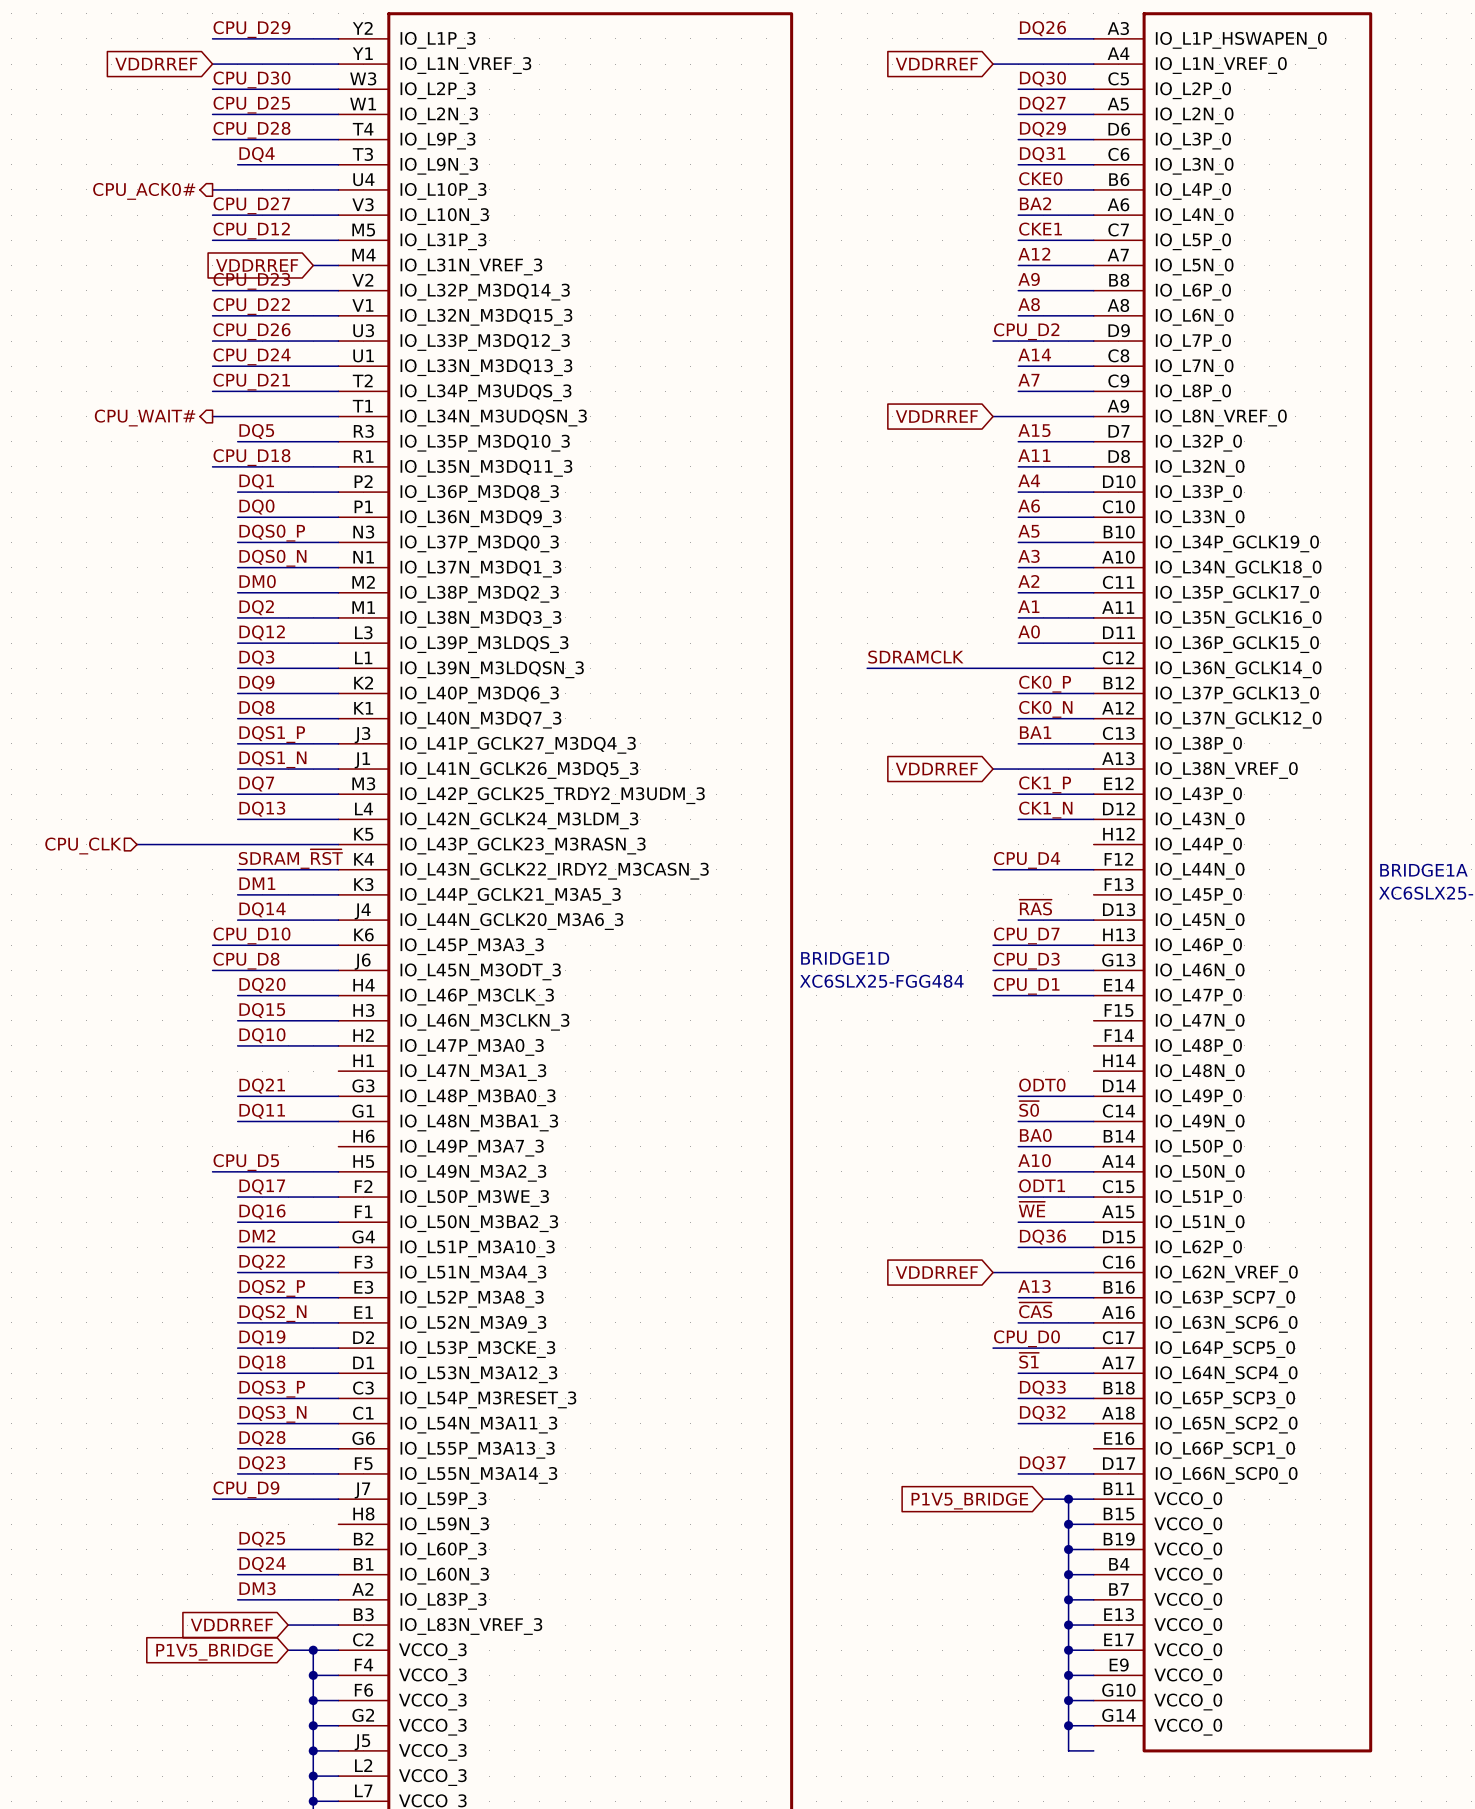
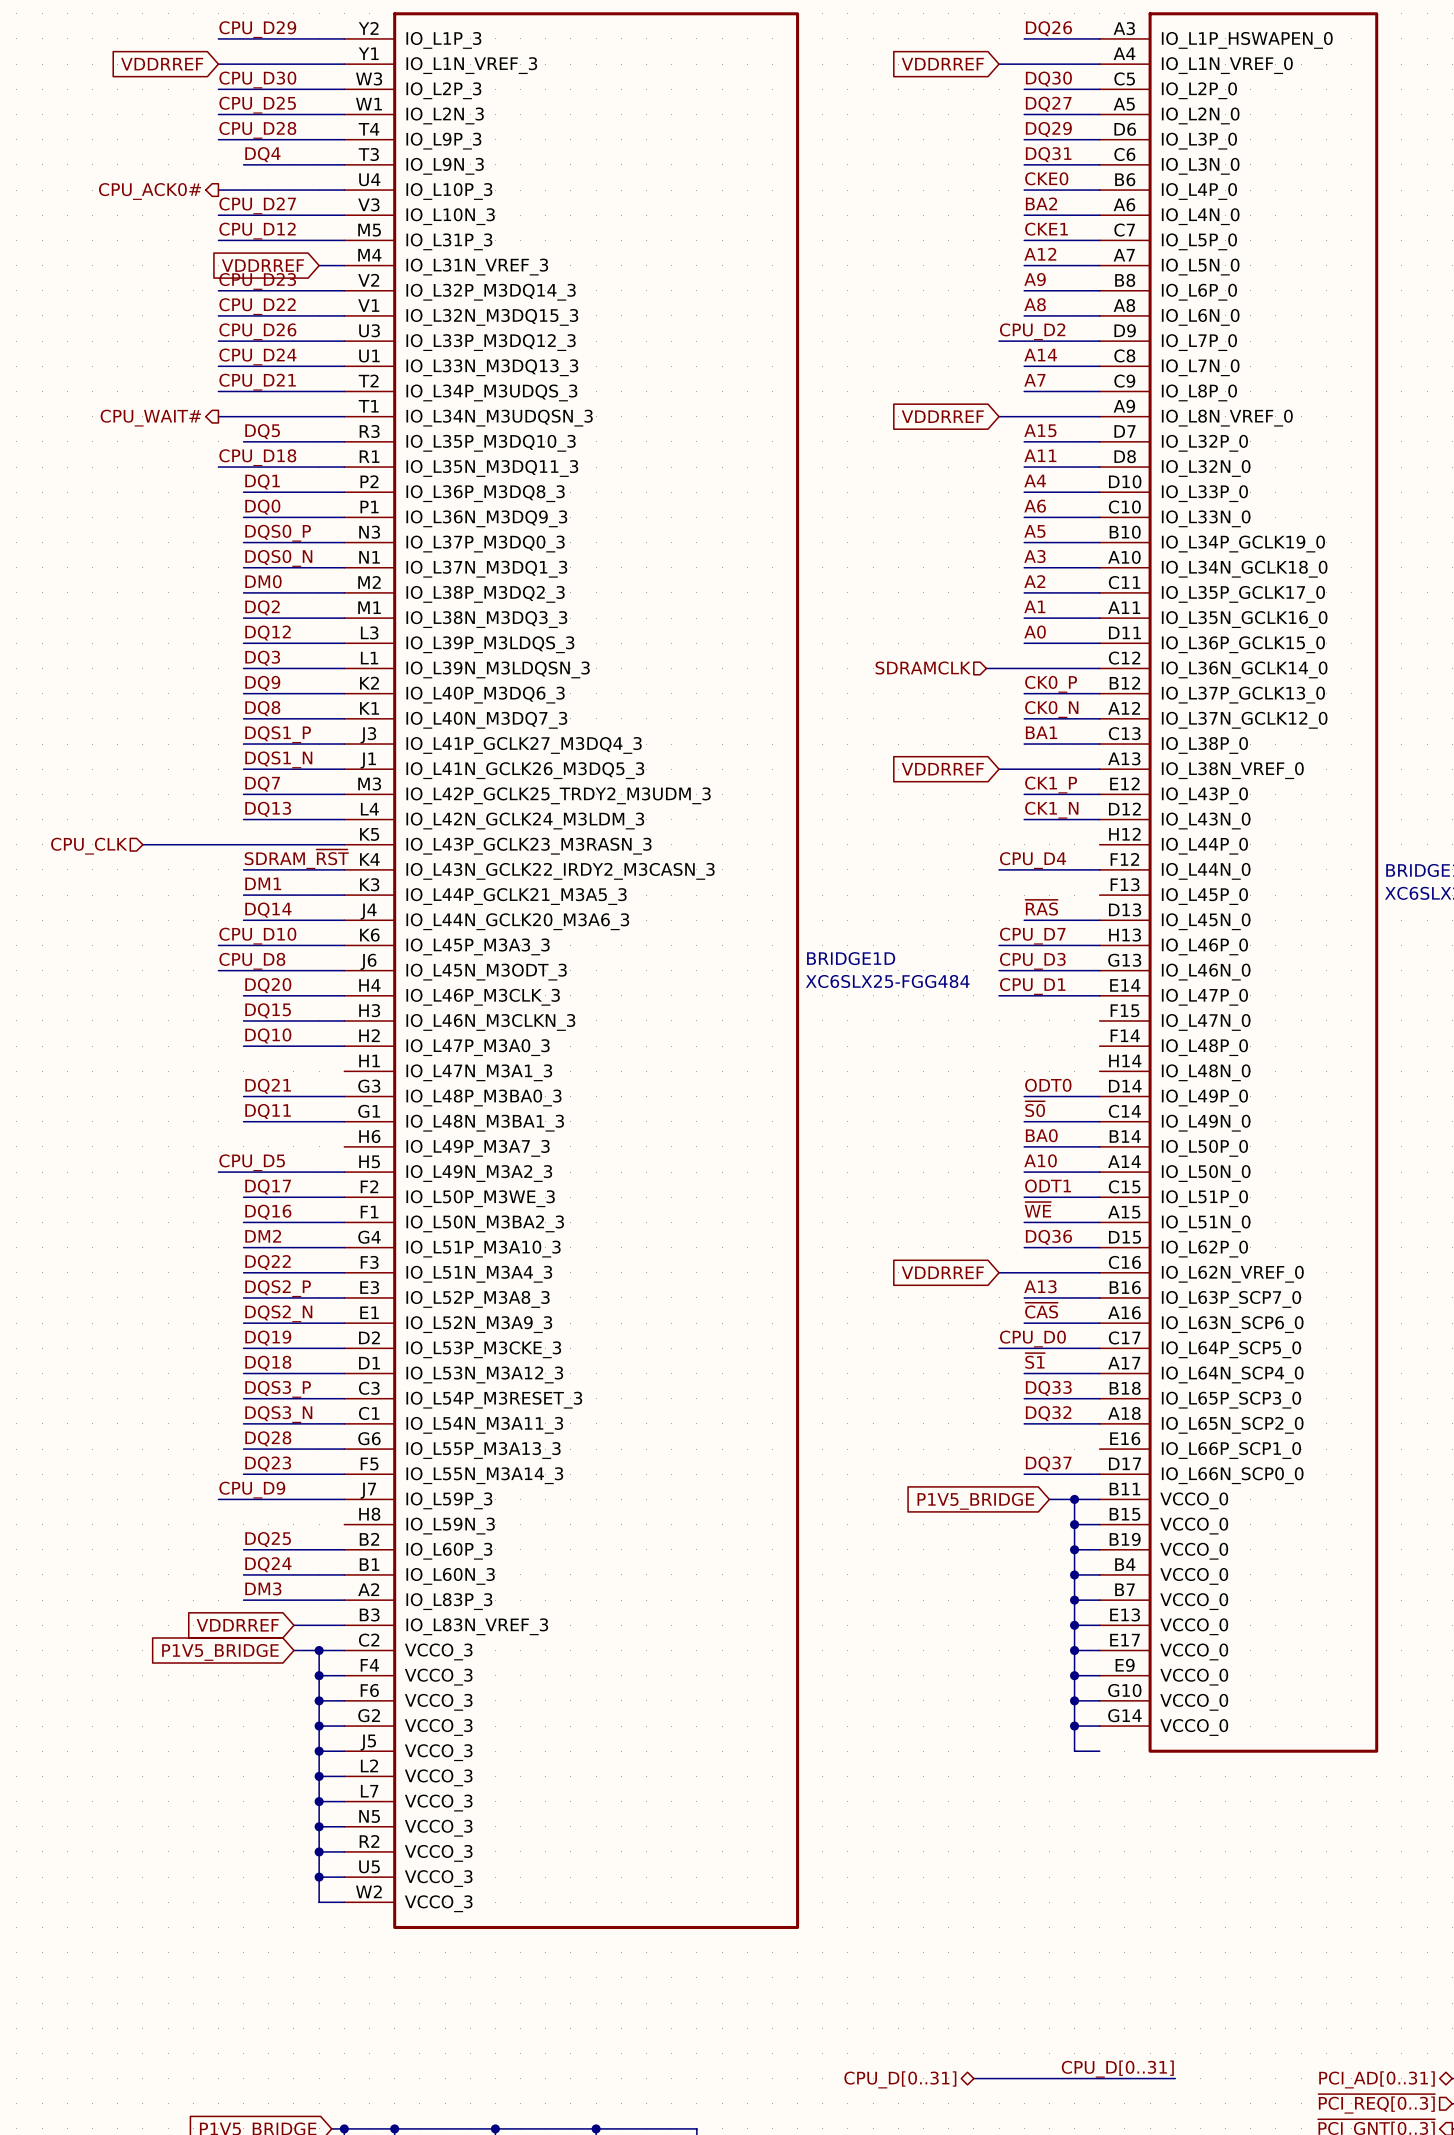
label: SDRAMCLK (915, 657) -> none
hierarchical label: none -> SDRAMCLK (923, 668)
wire: (867, 668) (980, 668) -> none

